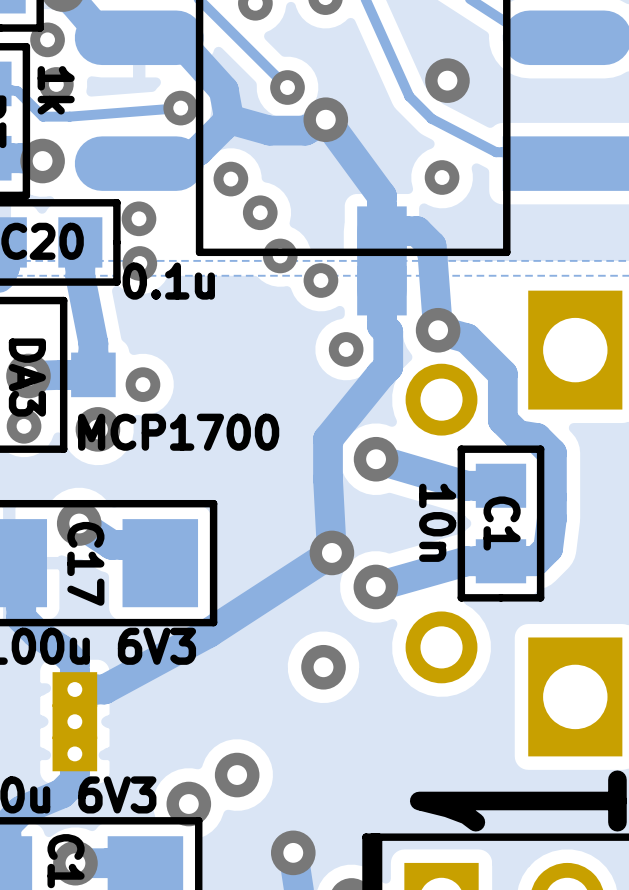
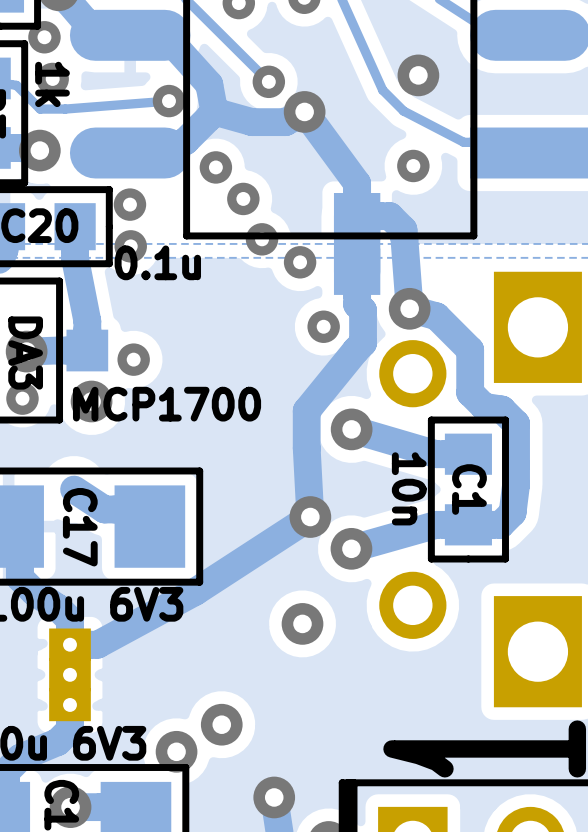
via: (79, 523) -> none

